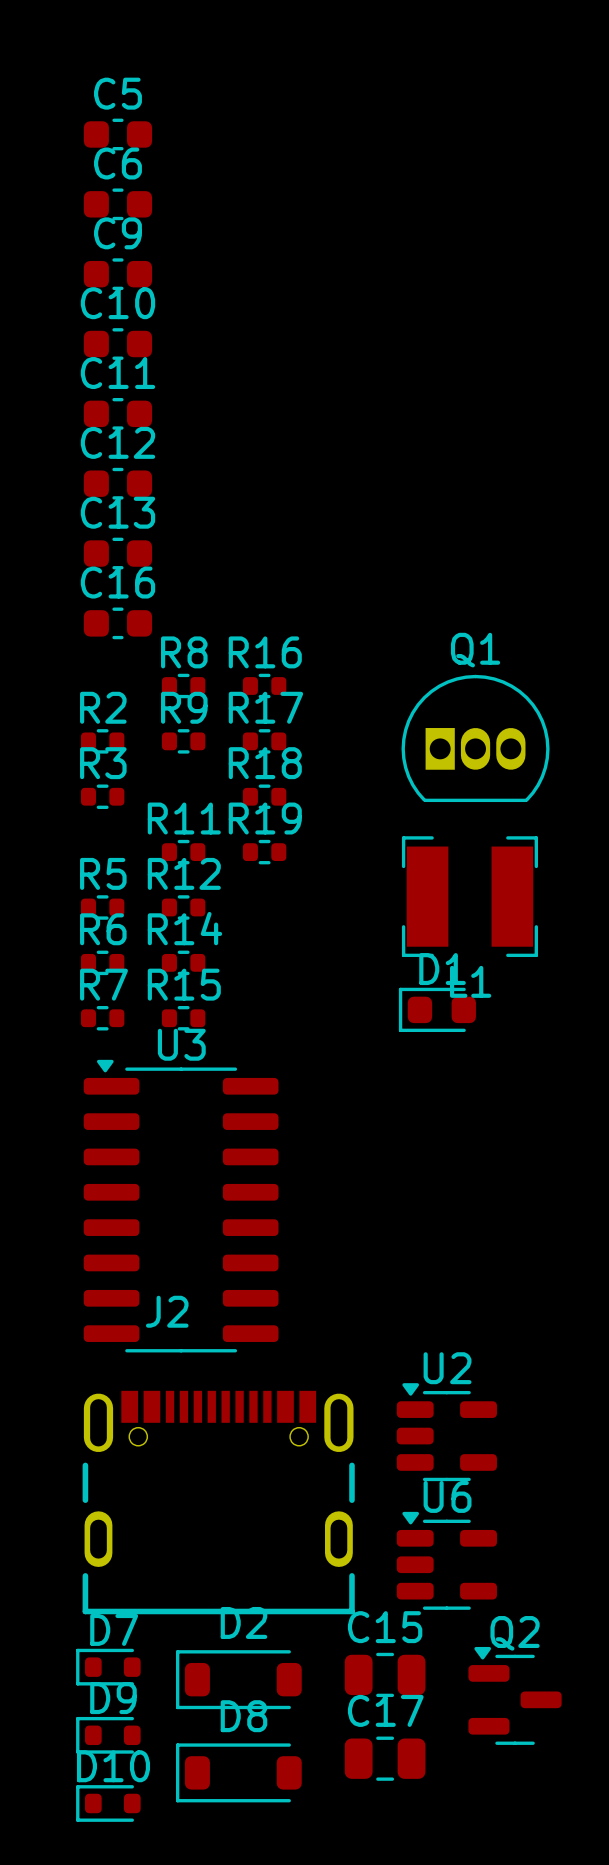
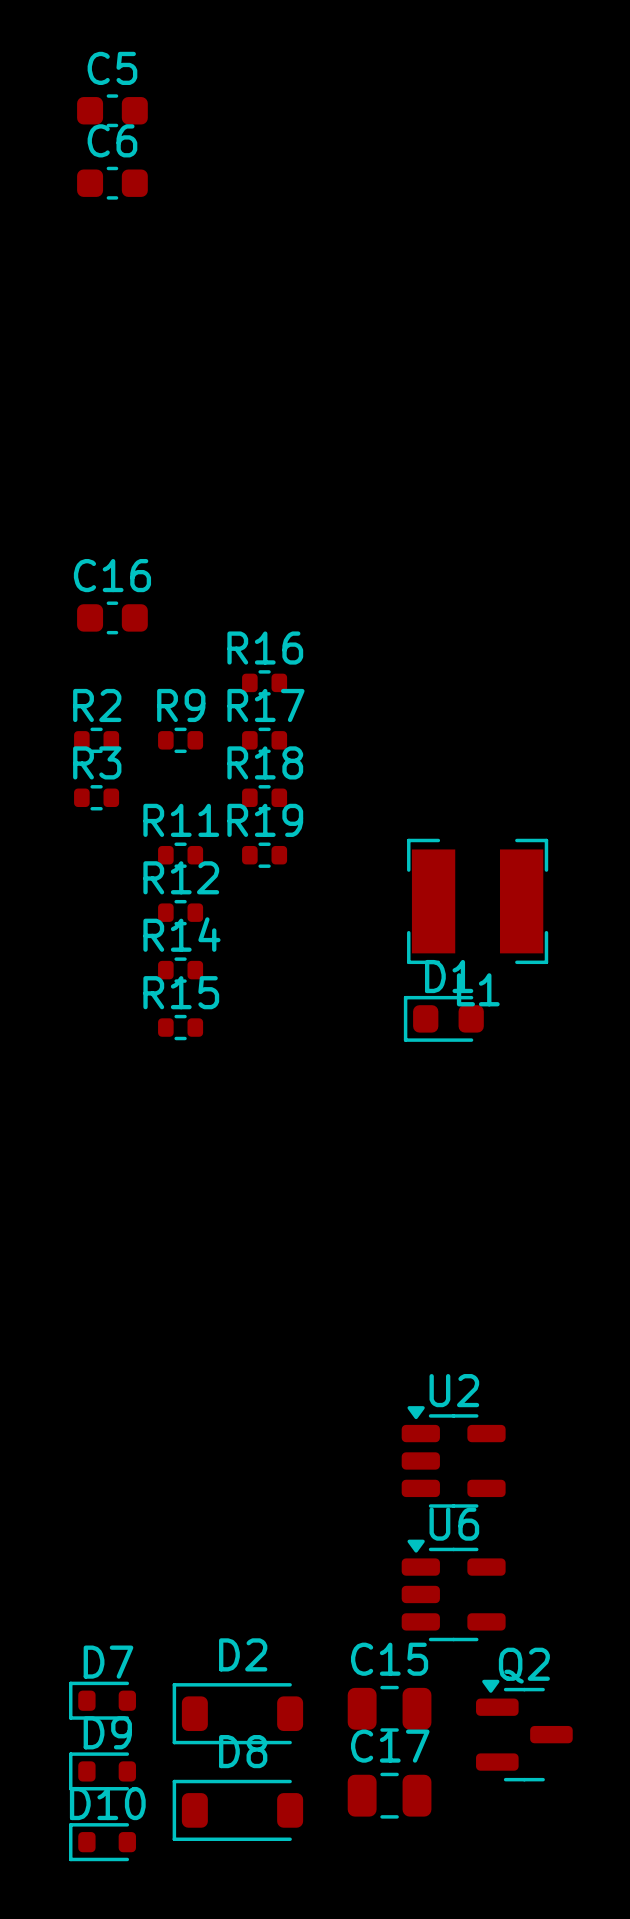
C9: (117, 274) -> none
C10: (117, 344) -> none
C11: (117, 413) -> none
C12: (117, 483) -> none
C13: (117, 553) -> none
R8: (183, 685) -> none
Q1: (475, 738) -> none
R5: (102, 907) -> none
R6: (102, 962) -> none
R7: (102, 1018) -> none
U3: (181, 1206) -> none
J2: (218, 1502) -> none

